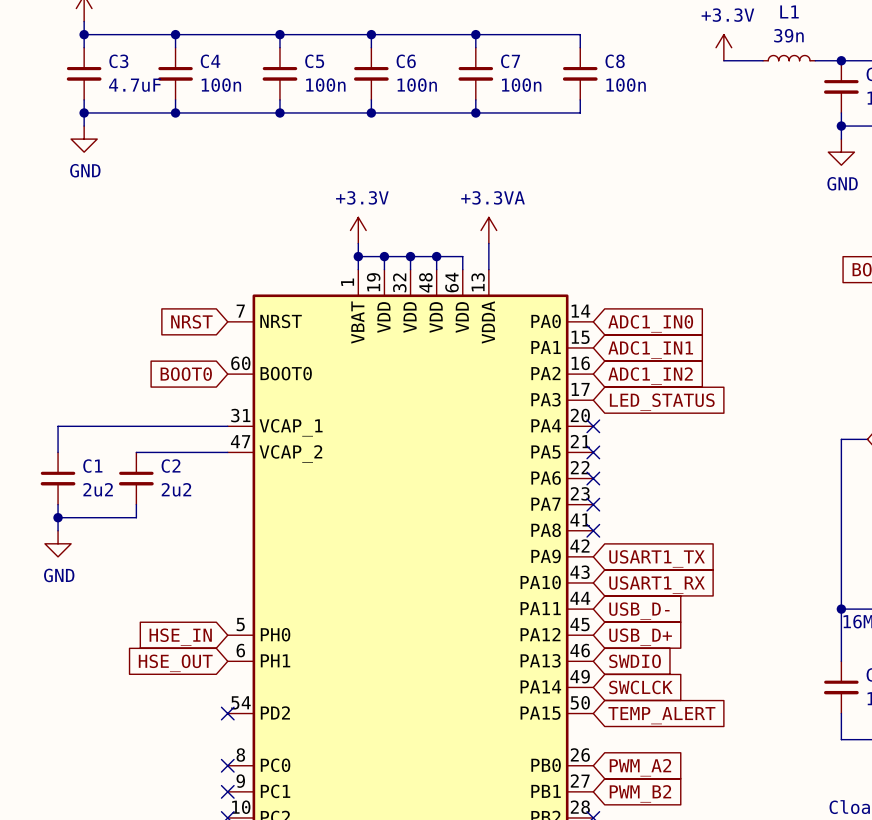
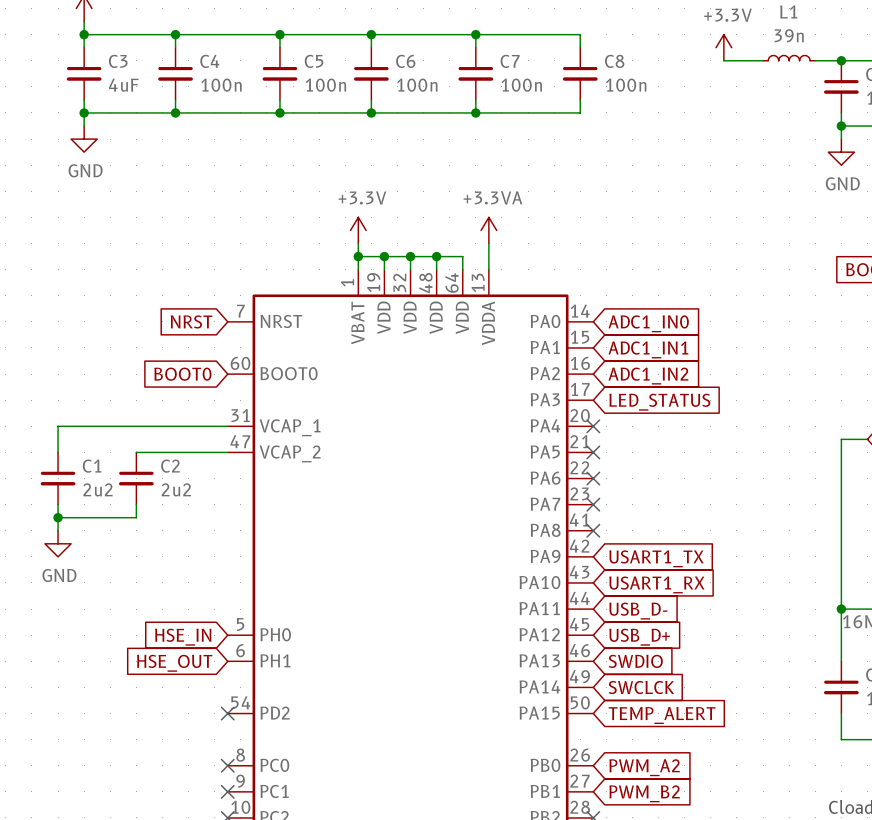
C3 value: 4.7uF (135, 85) -> 4uF (123, 85)

